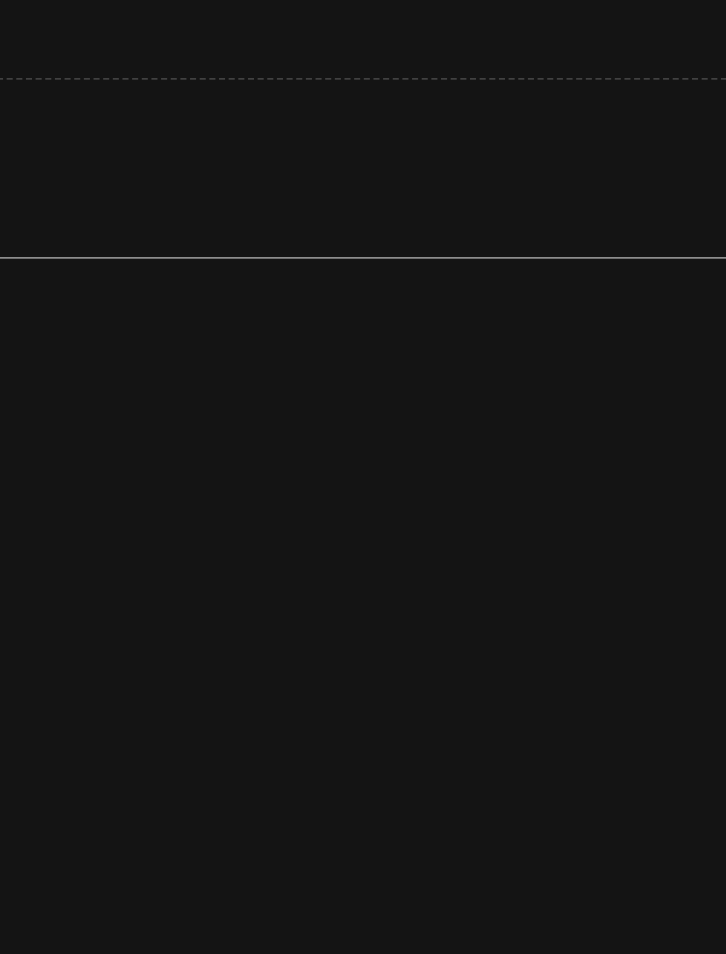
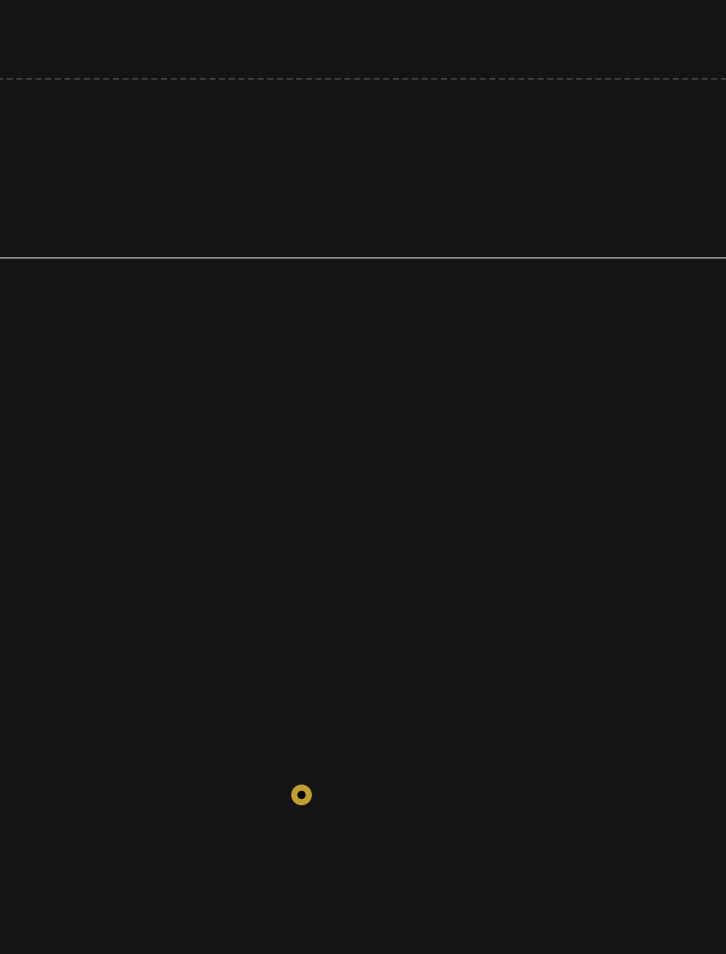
via: none -> (301, 794)

